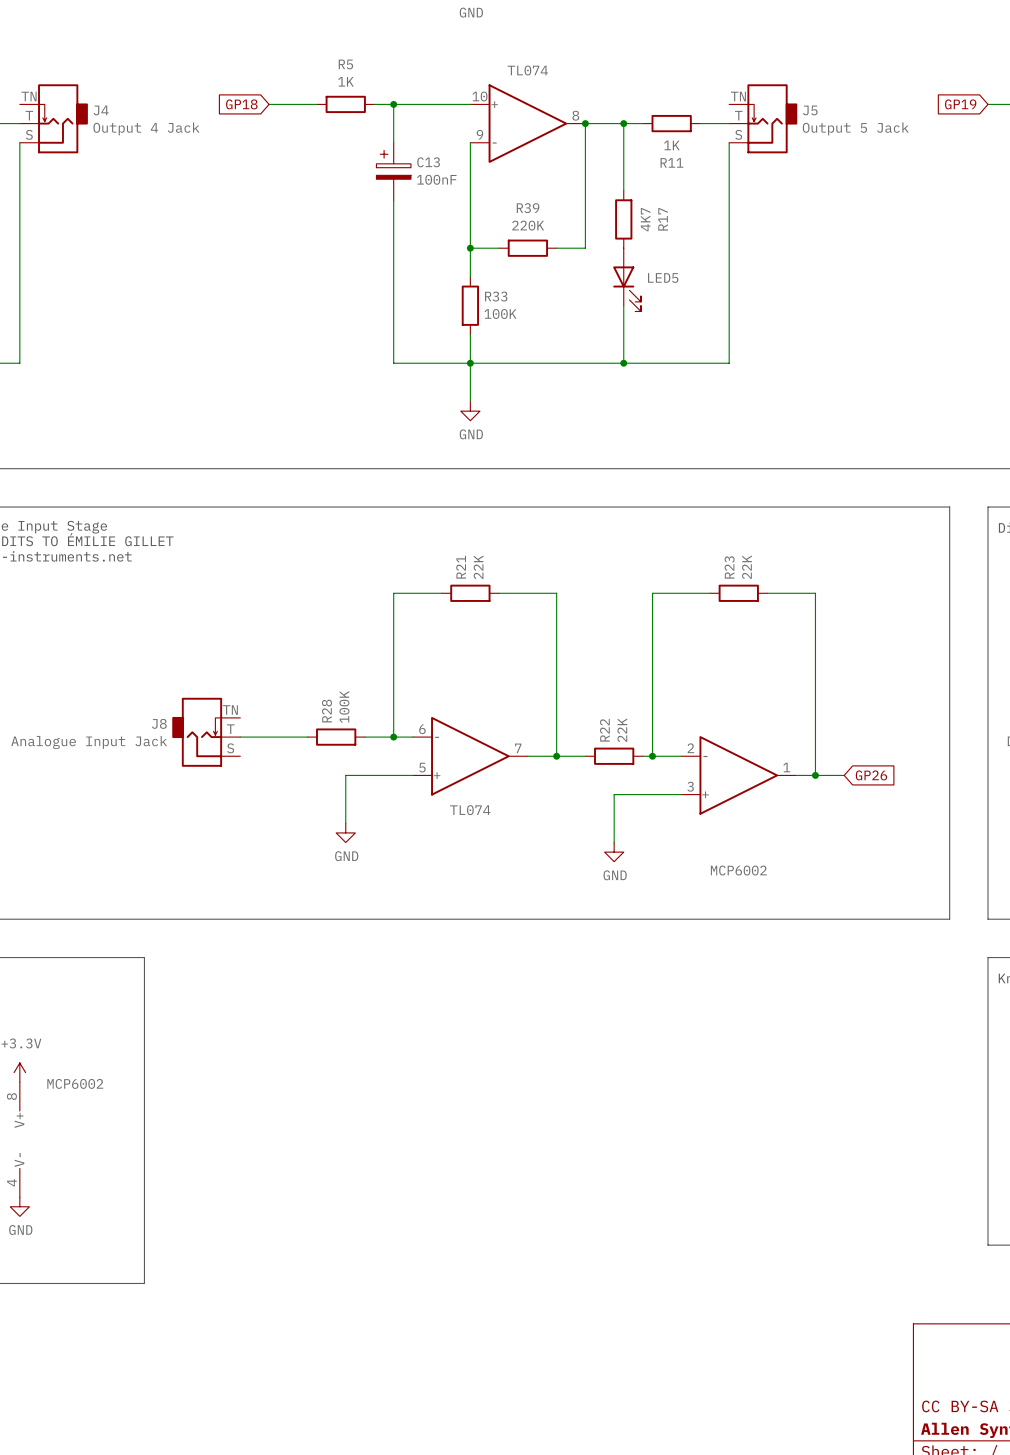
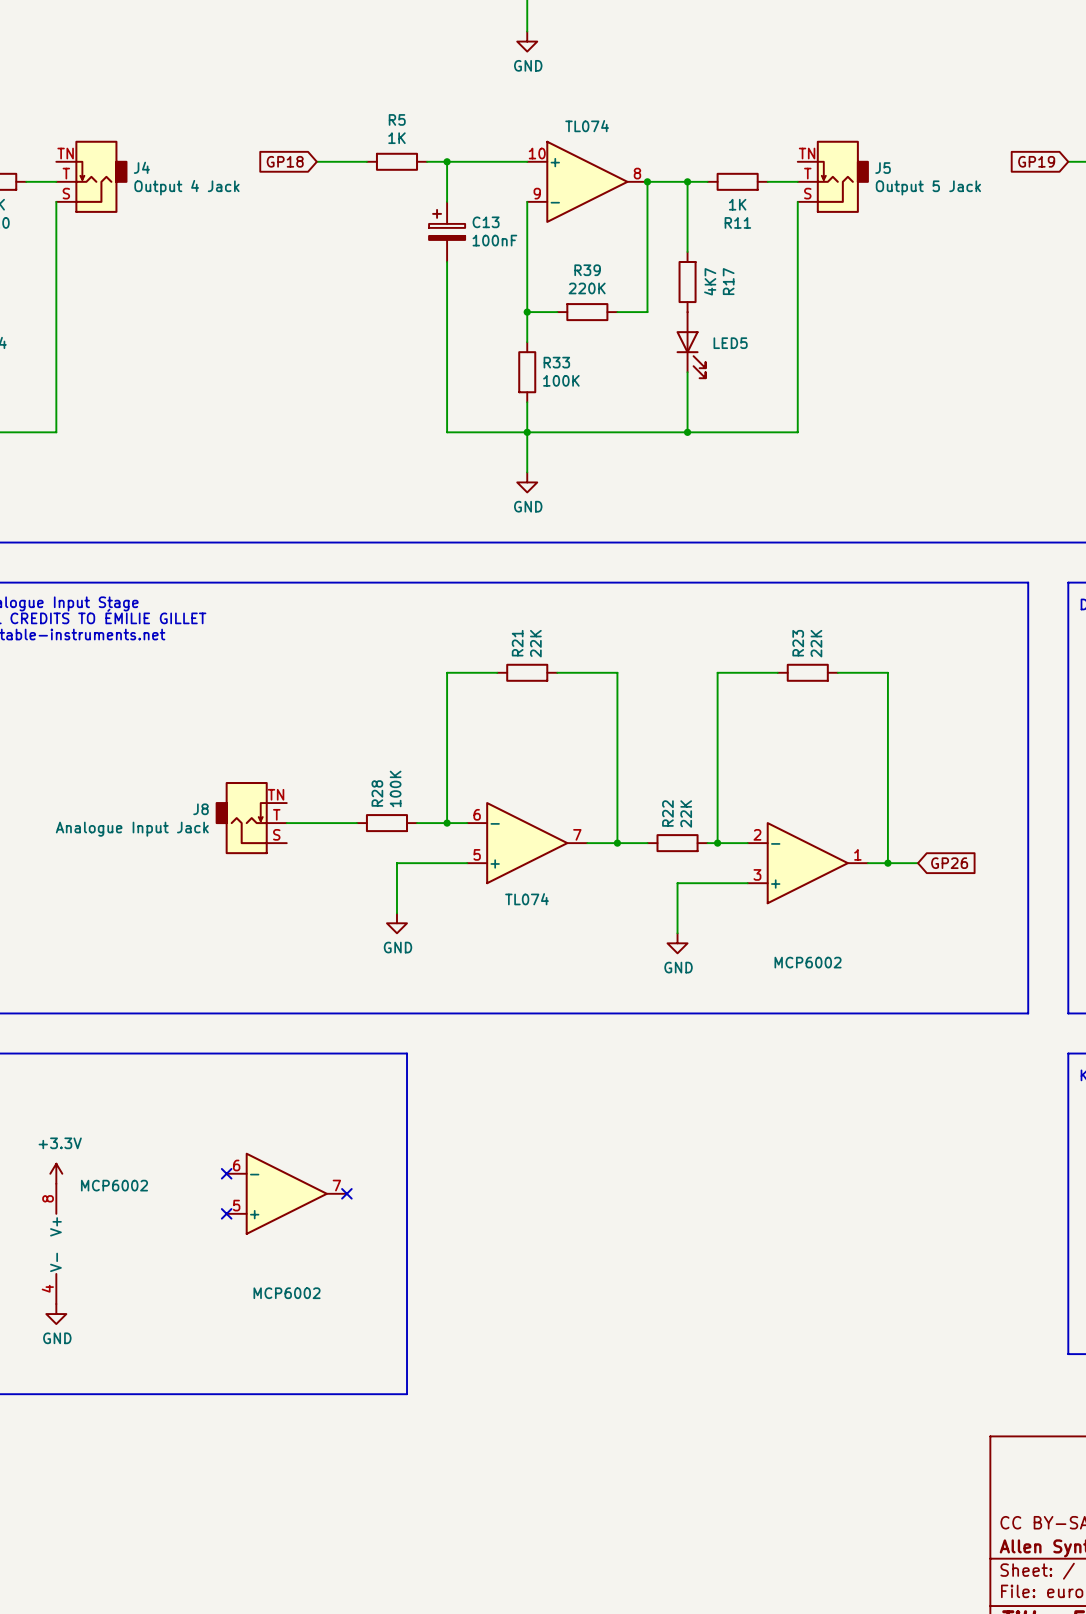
line: (144, 957) (144, 1283) -> (186, 1053) (407, 1053) (407, 1394) (186, 1394)
no-connect mark: none -> (226, 1173)
part: none -> MCP6002 (286, 1193)
no-connect mark: none -> (346, 1193)
no-connect mark: none -> (226, 1213)

